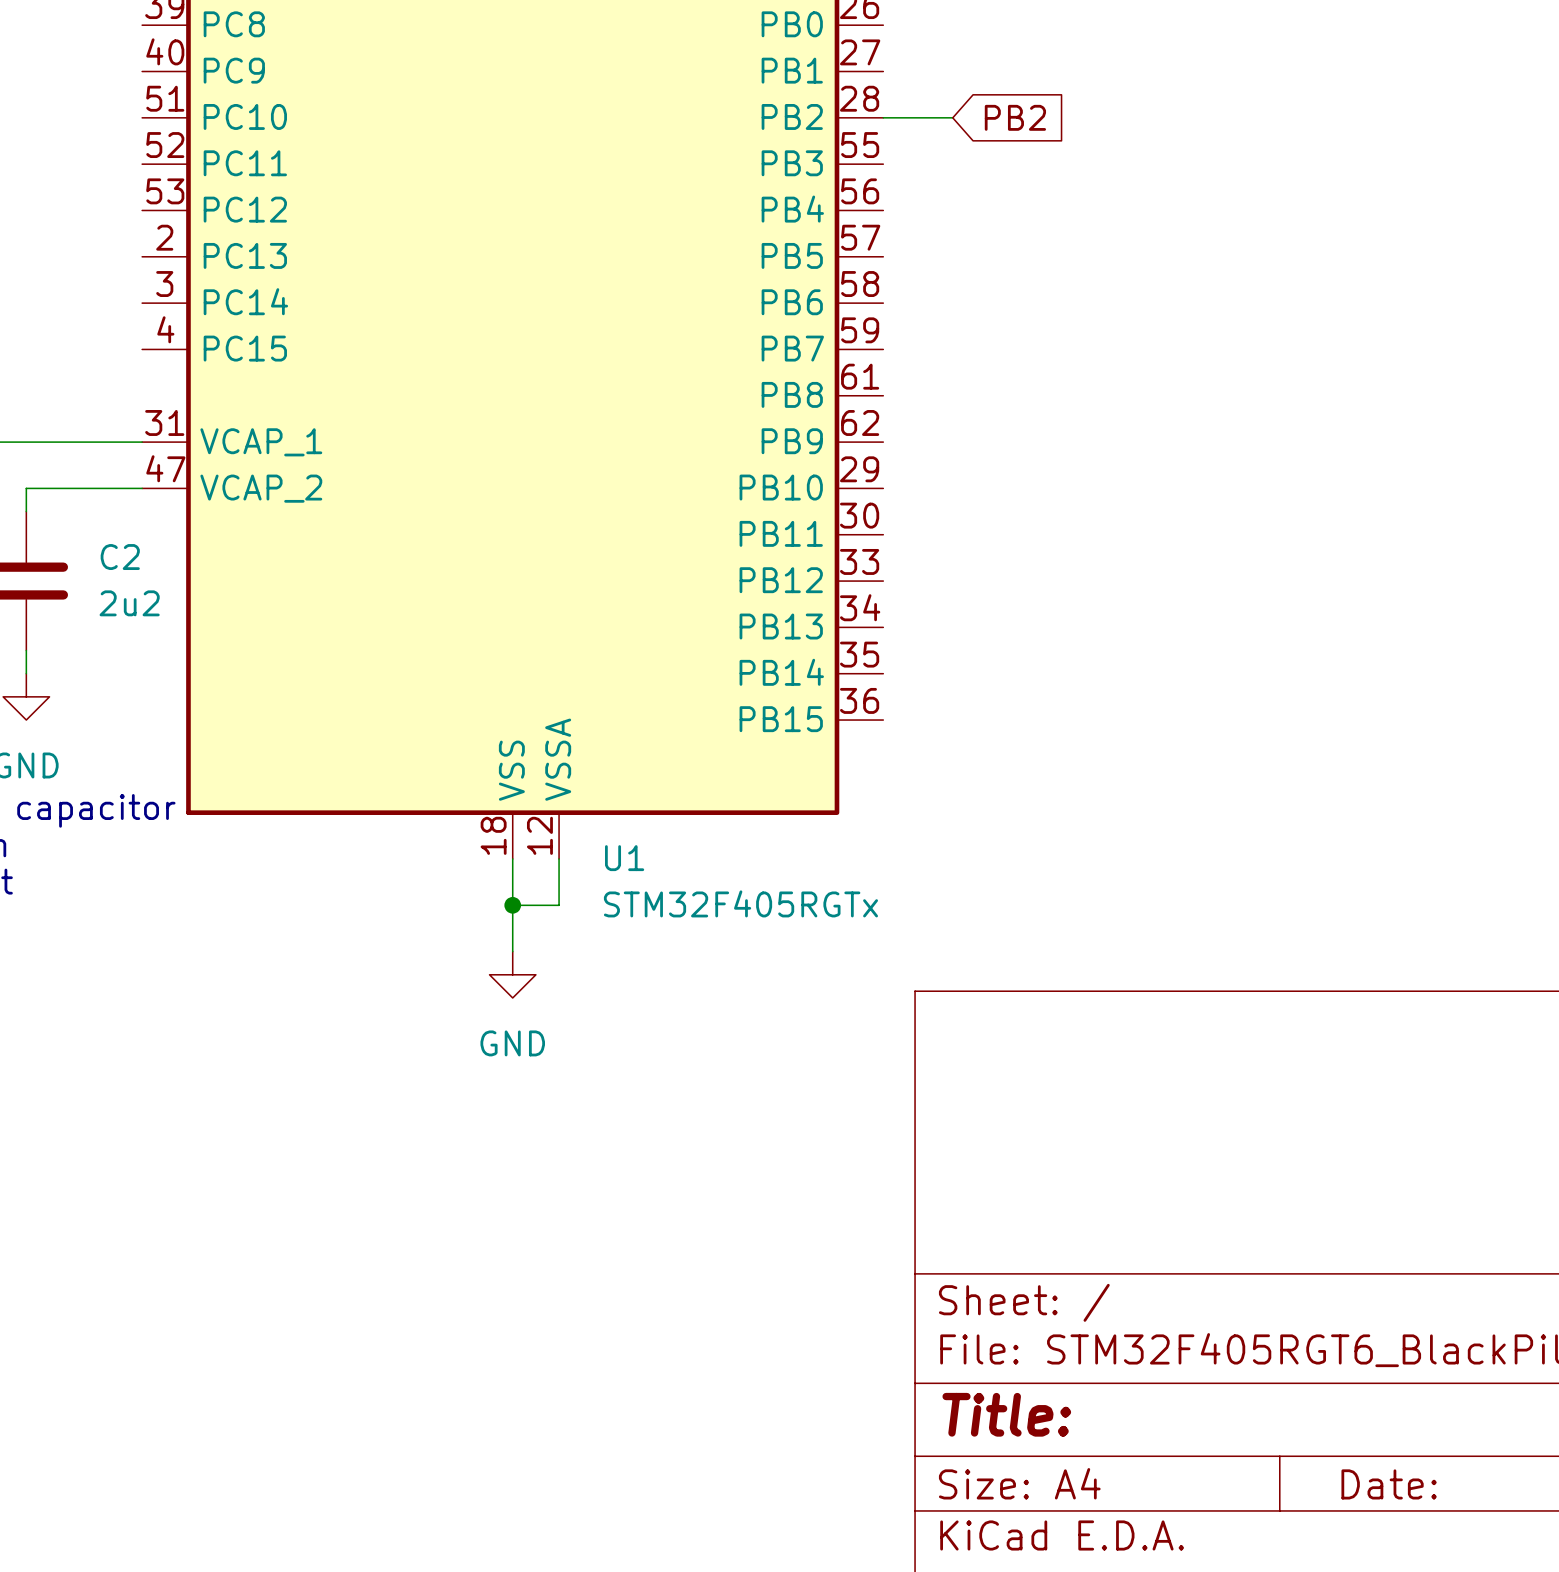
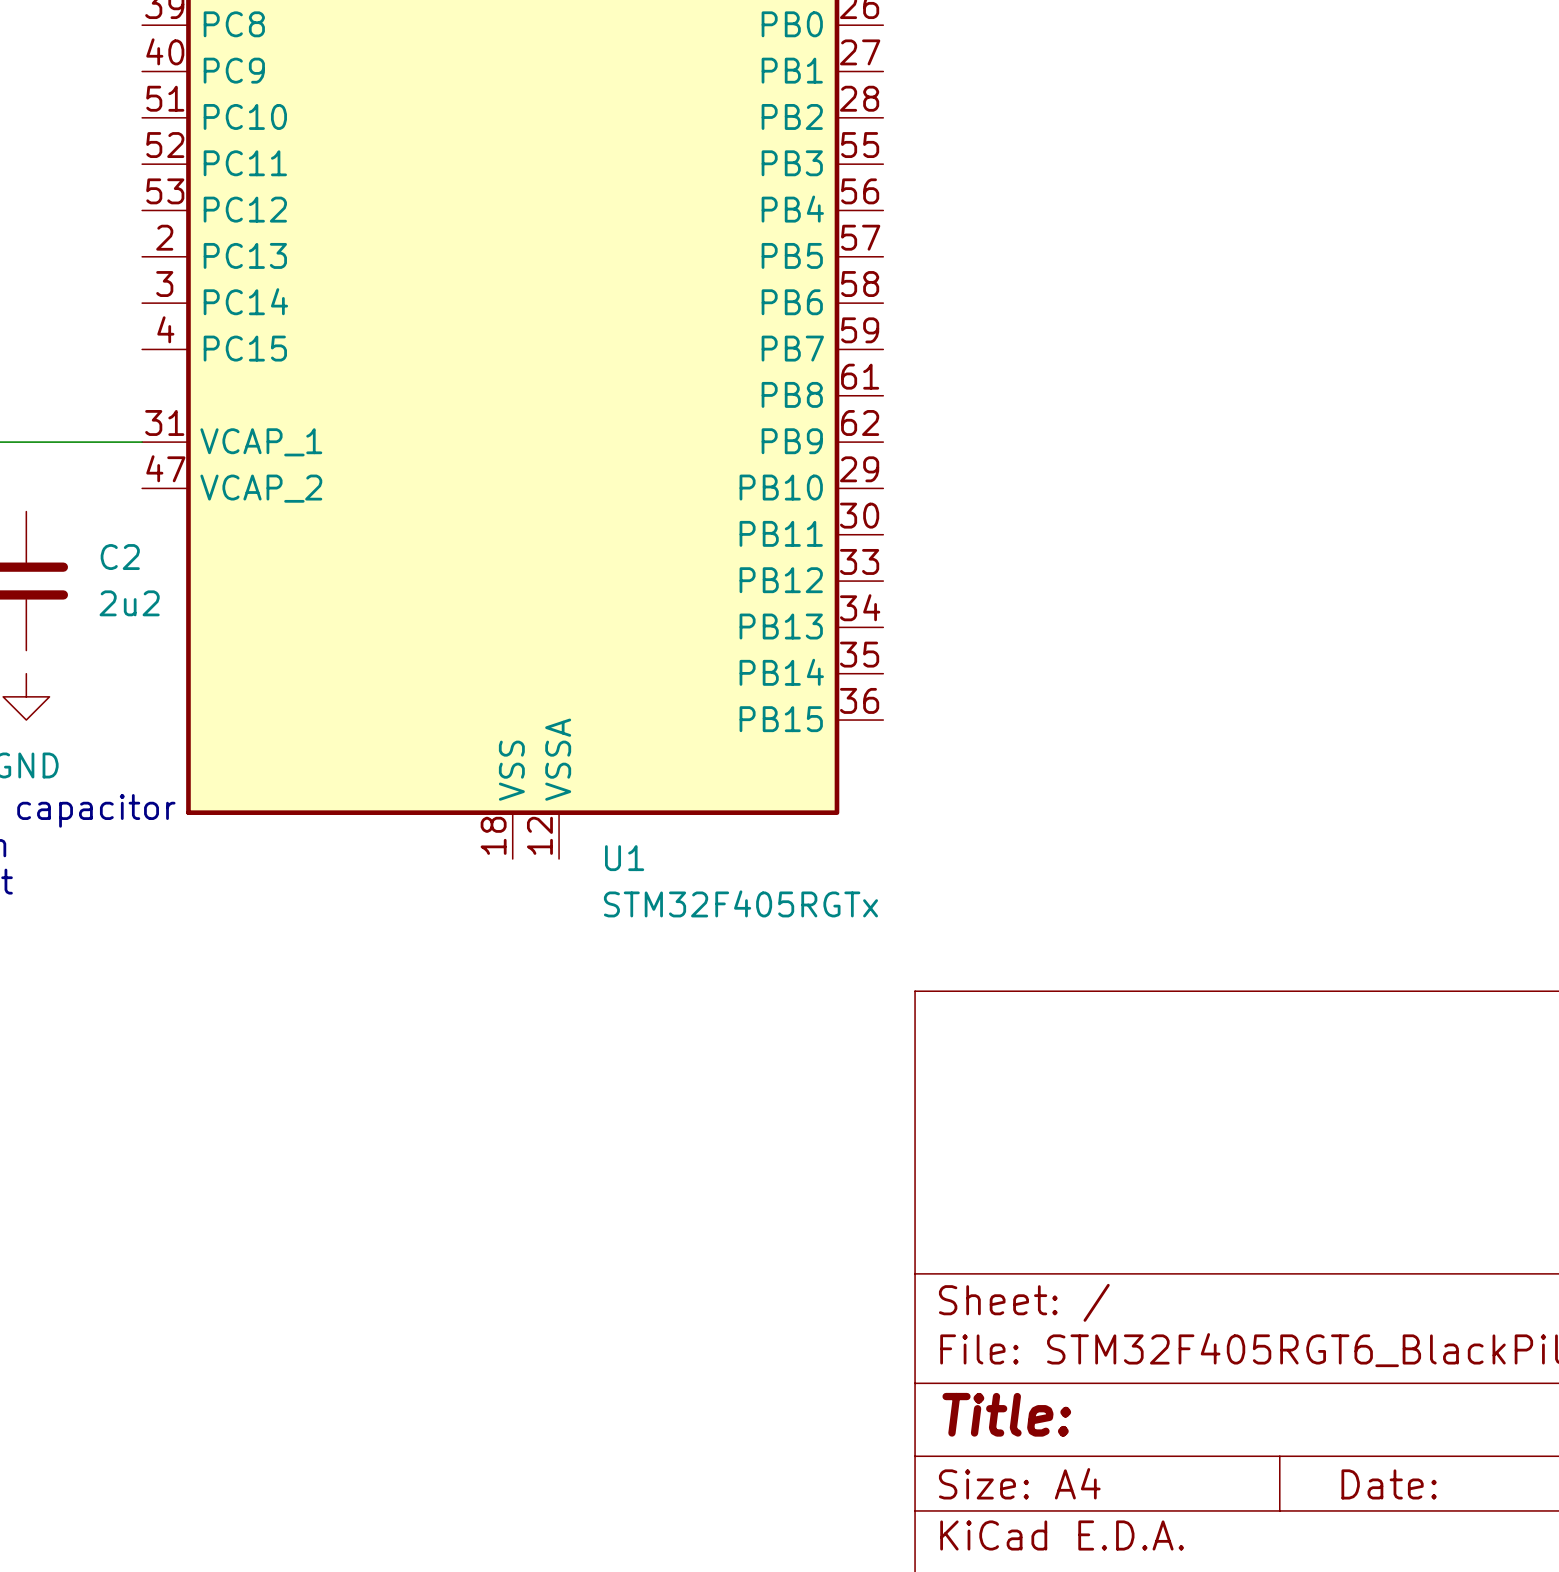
wire: (883, 117) (952, 117) -> none
global label: PB2 (1015, 117) -> none
wire: (142, 488) (26, 488) (26, 511) -> none
wire: (26, 650) (26, 673) -> none
wire: (512, 858) (512, 951) -> none
wire: (559, 858) (559, 905) (512, 905) -> none
junction: (512, 905) -> none
power symbol: GND (512, 974) -> none

